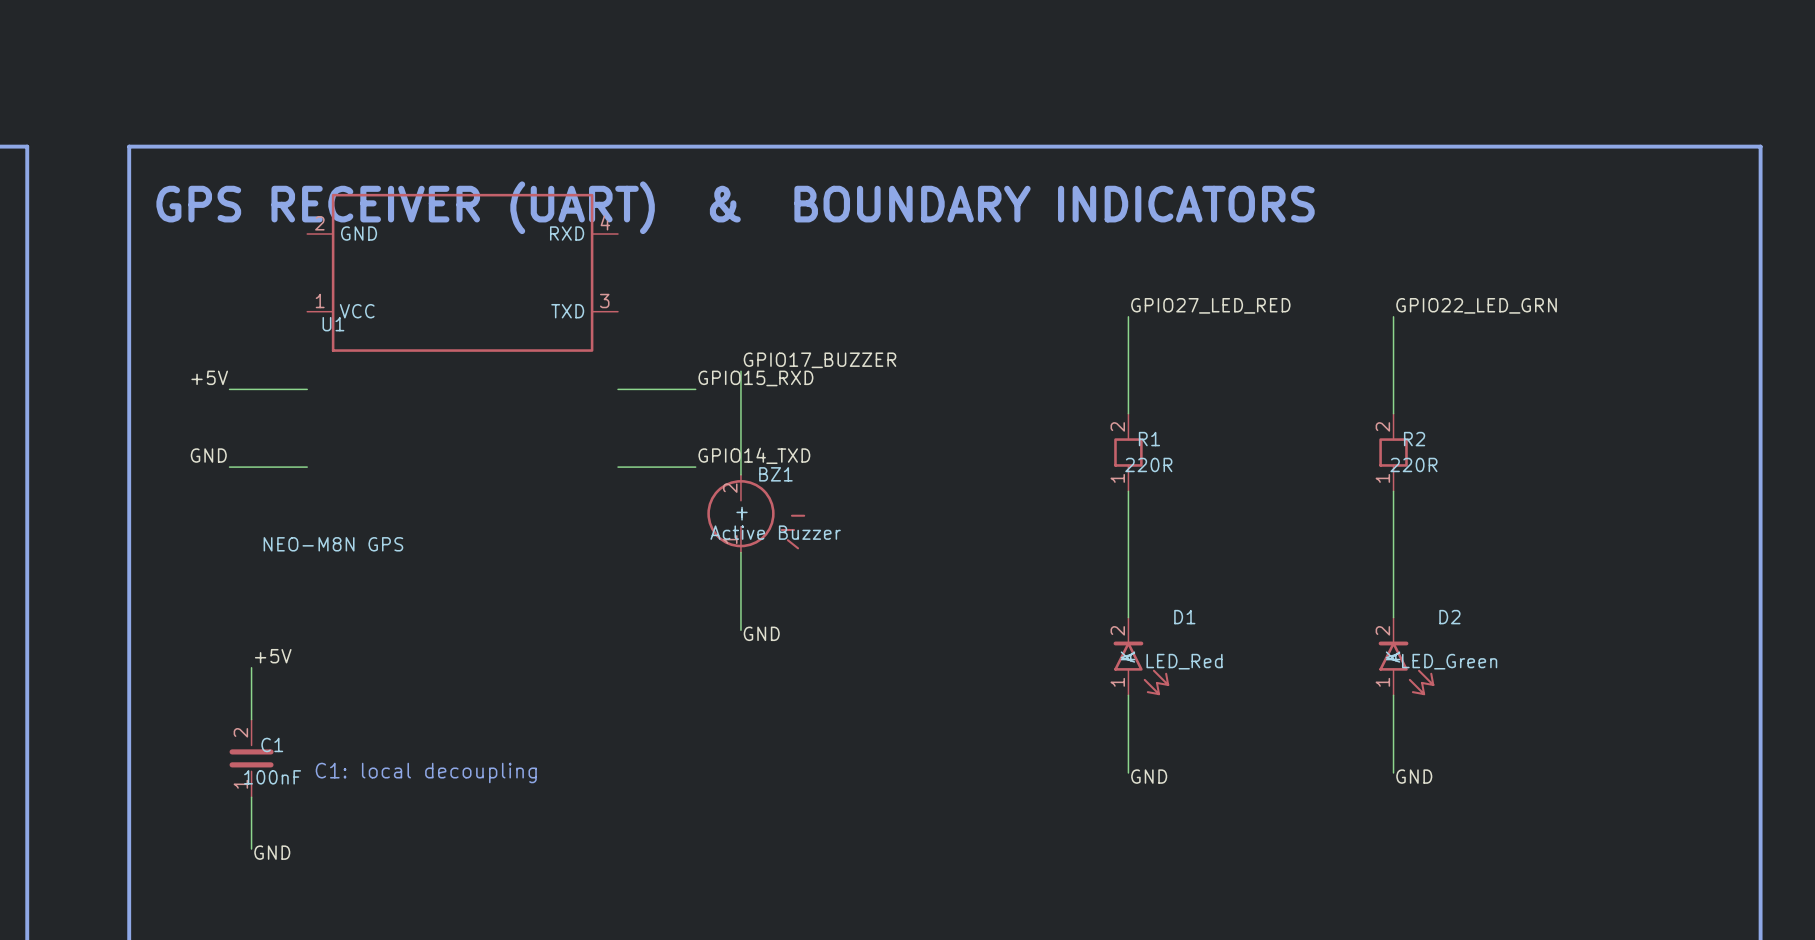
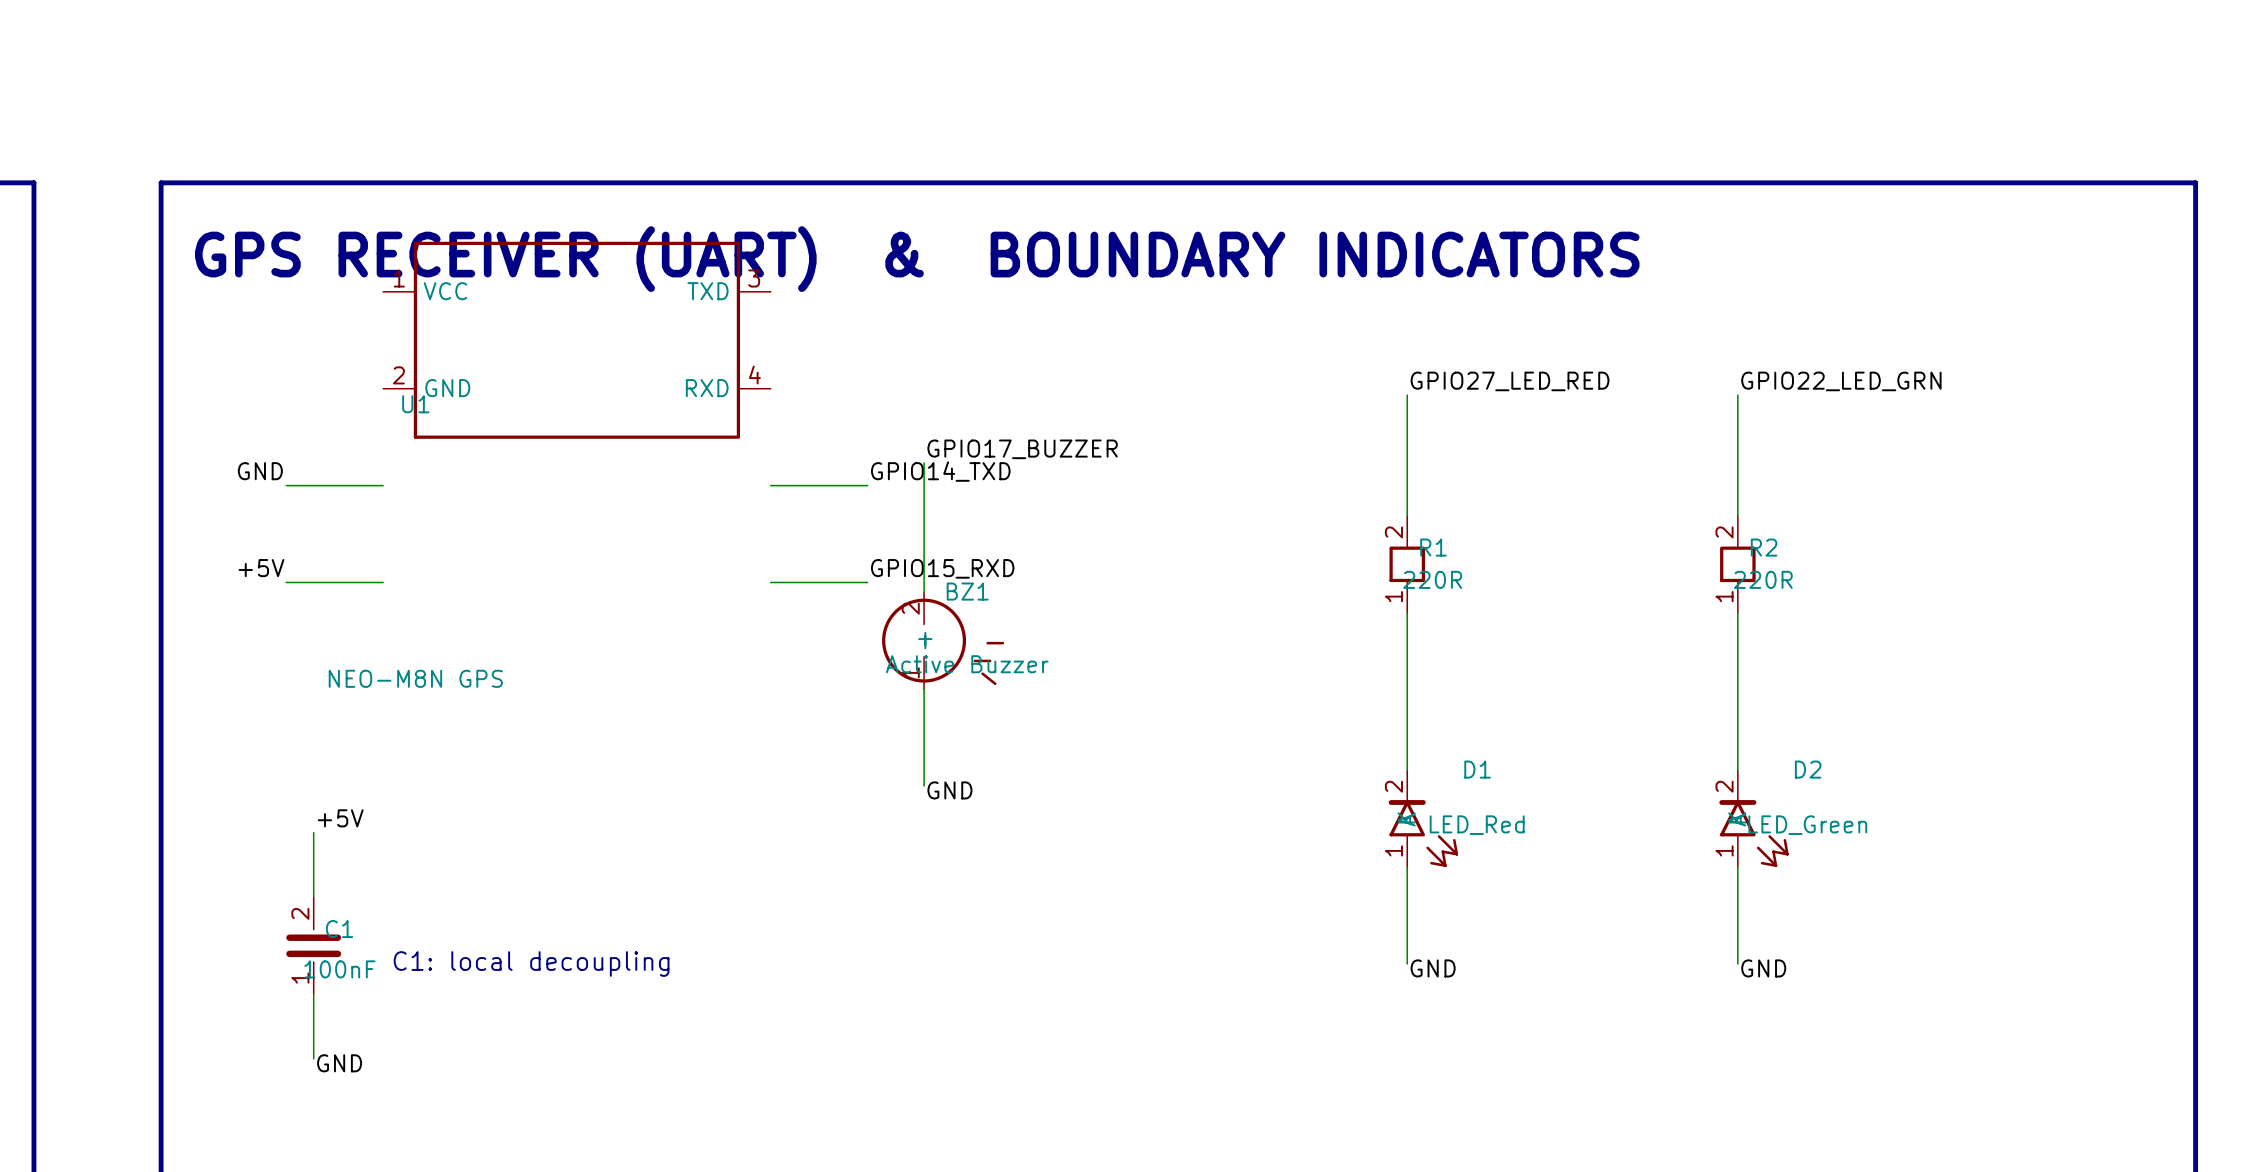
U1 flip: as is (462, 272) -> up-down (576, 340)
label: +5V (209, 377) -> GND (260, 471)
label: GPIO15_RXD (755, 378) -> GPIO14_TXD (940, 471)
label: GND (208, 455) -> +5V (261, 568)
label: GPIO14_TXD (754, 455) -> GPIO15_RXD (942, 568)

